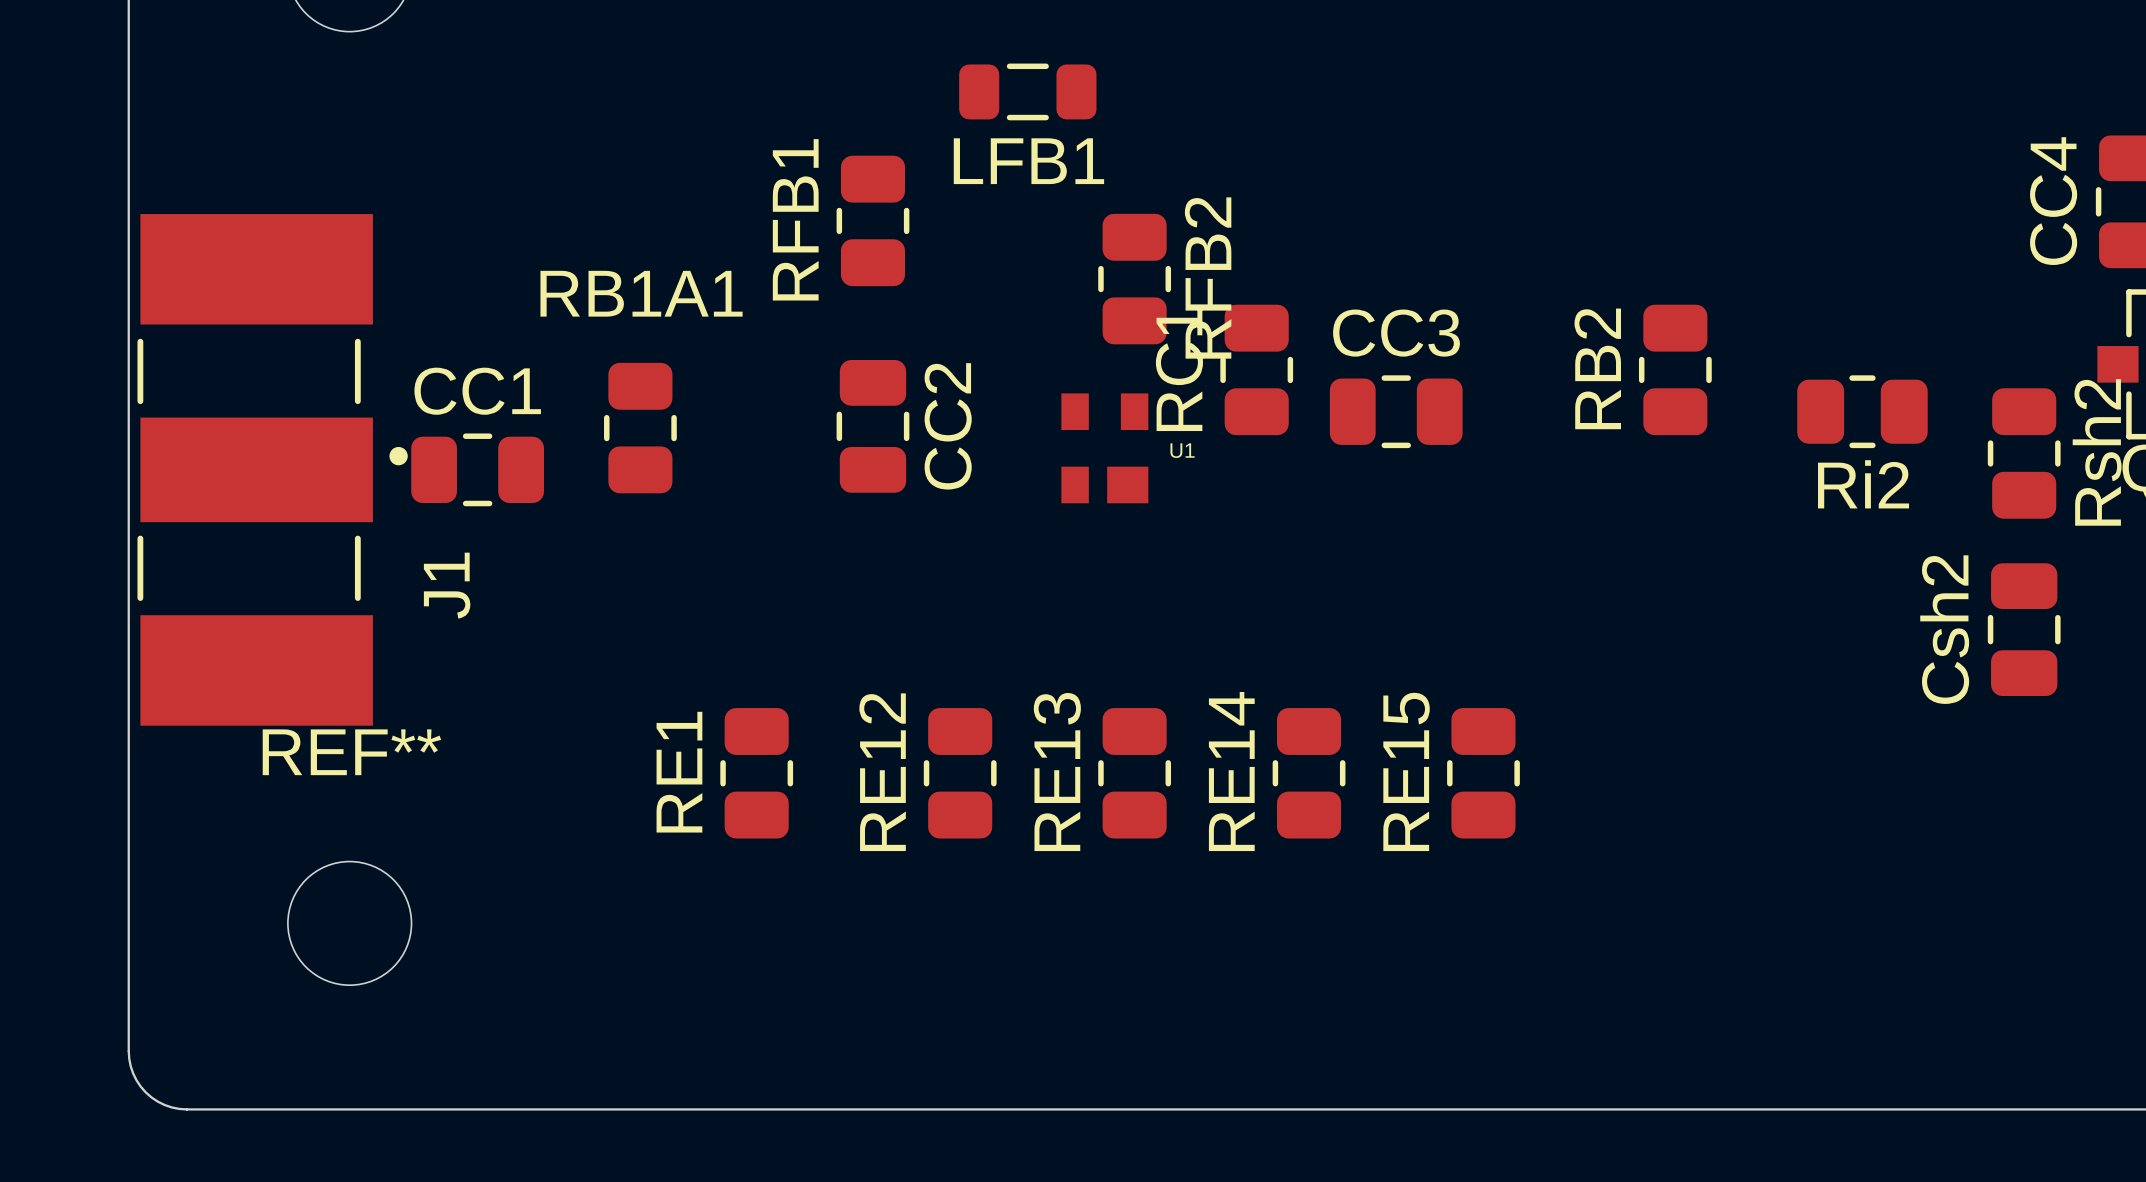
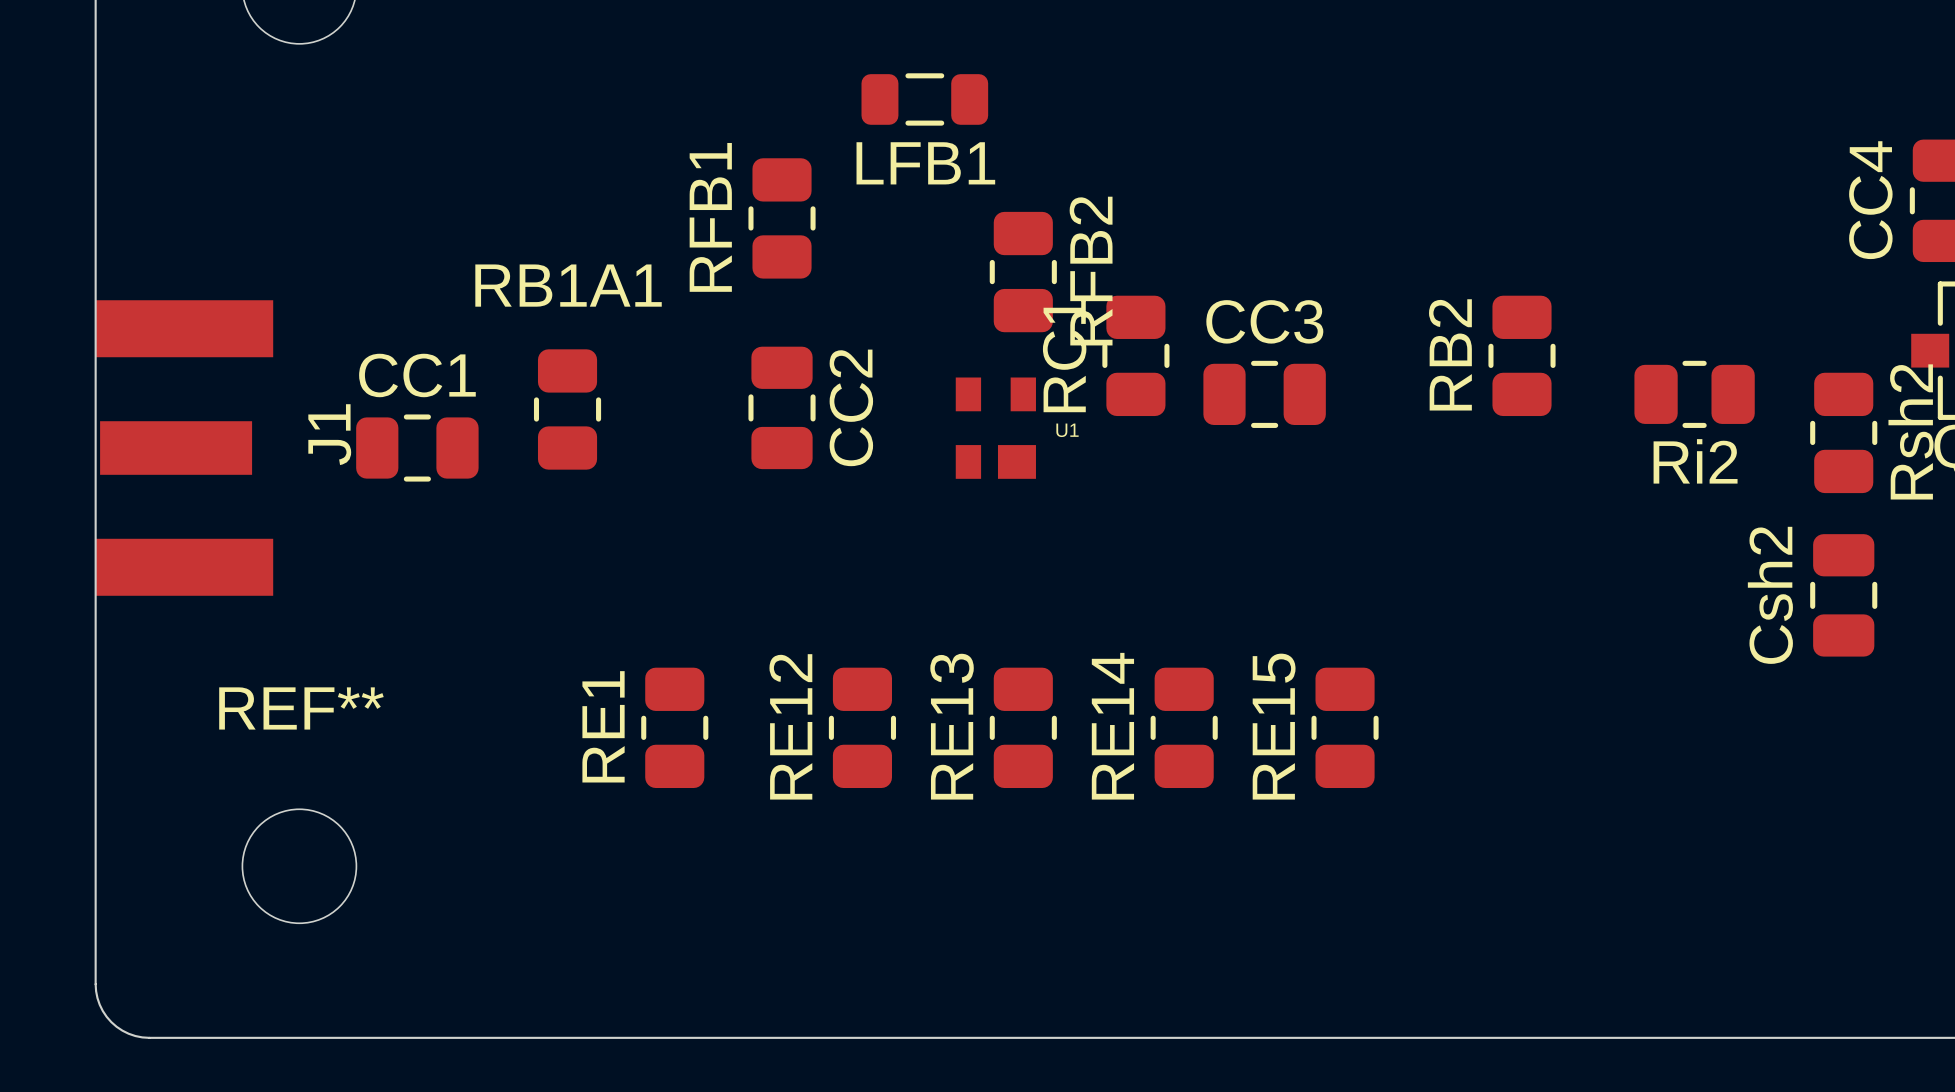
J1 footprint: [137, 214, 408, 726] -> [95, 300, 274, 596]
J1 name position: J1 (447, 585) -> J1 (329, 434)

